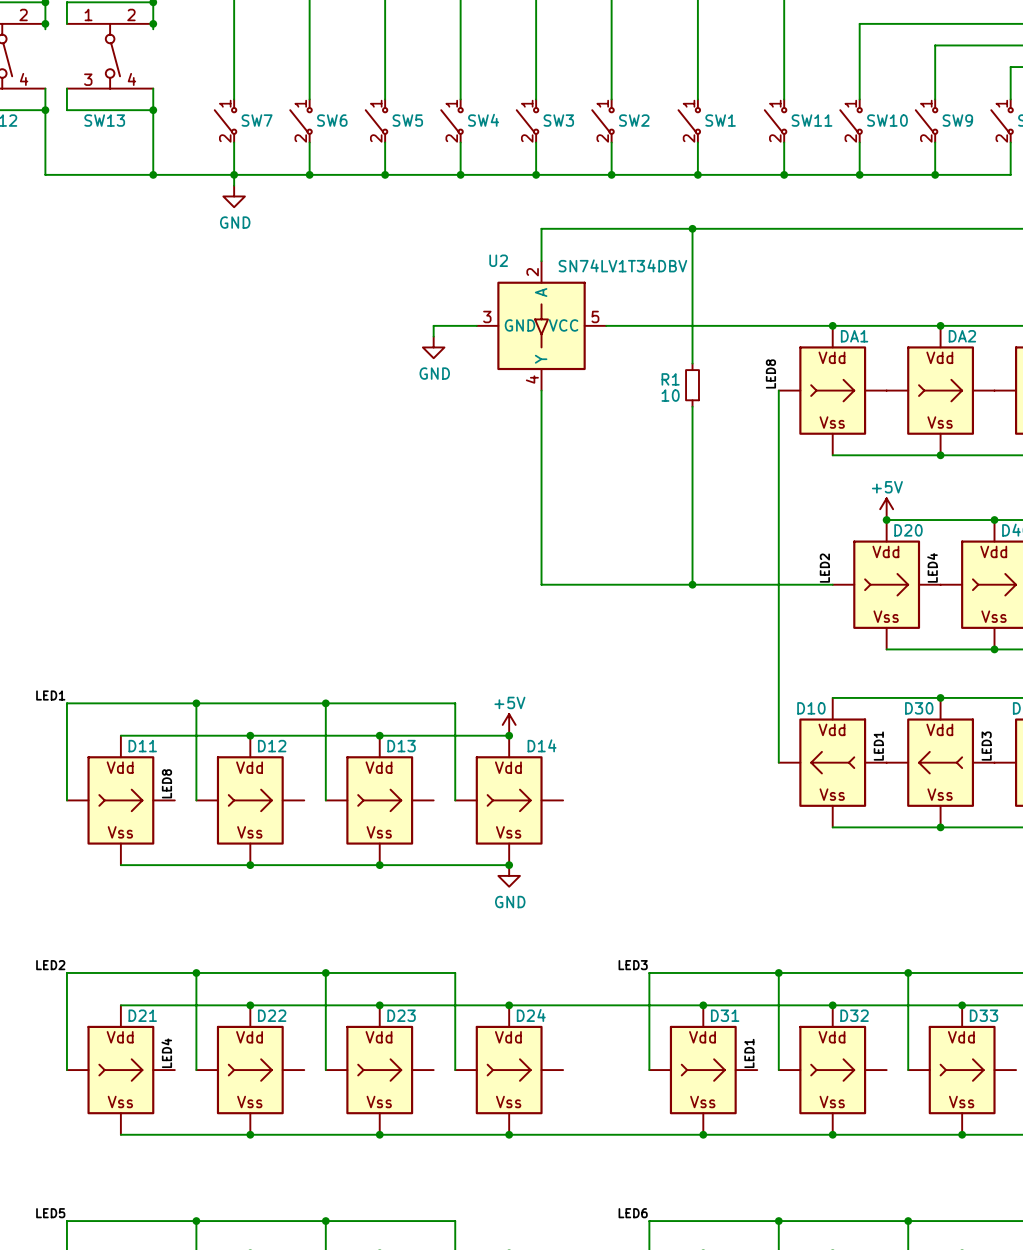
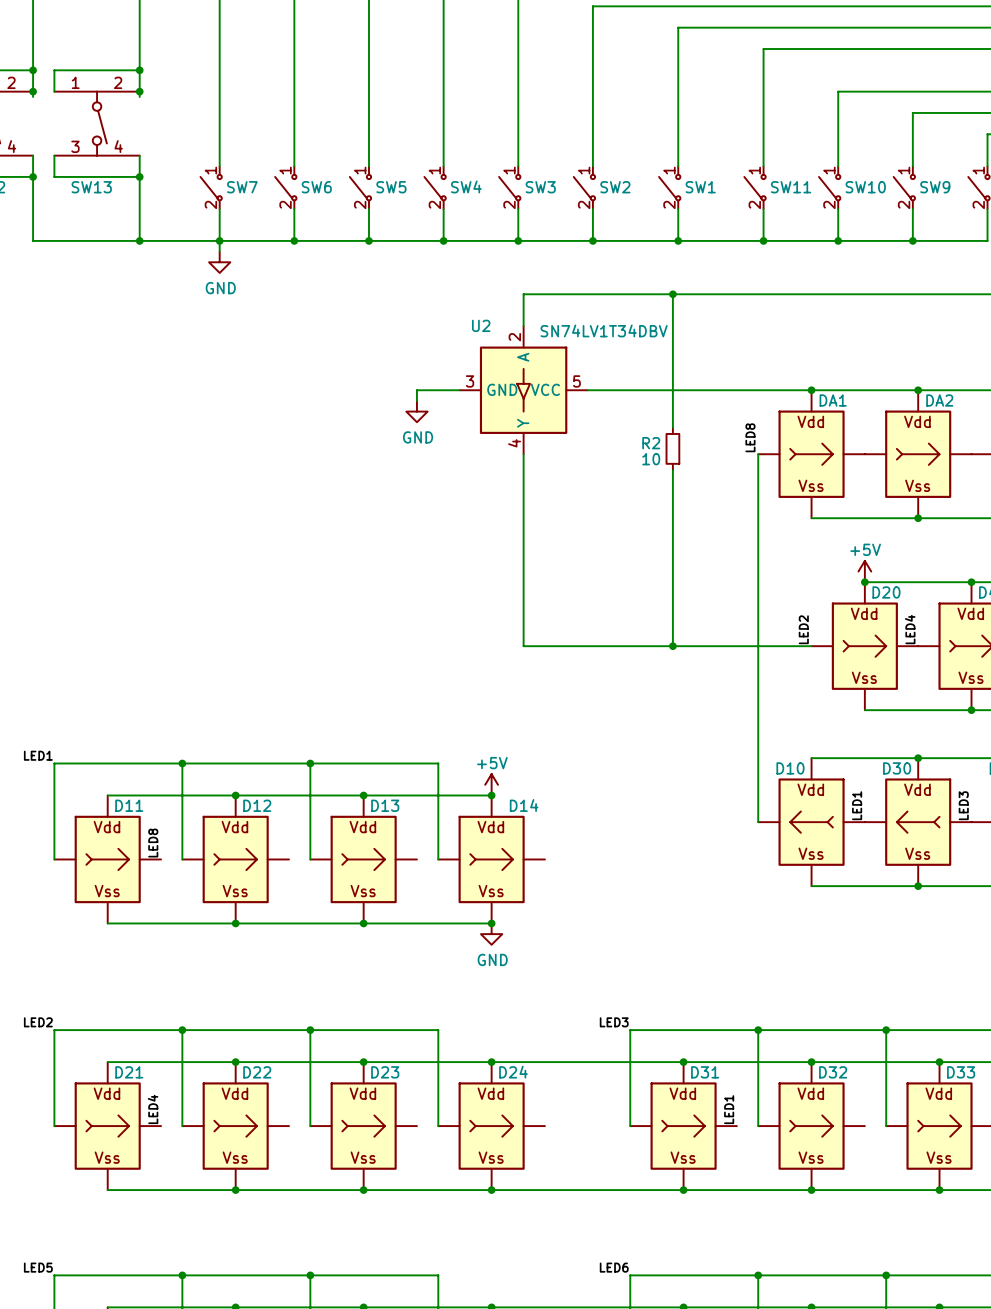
R1 name: R1 (670, 379) -> R2 (651, 443)

